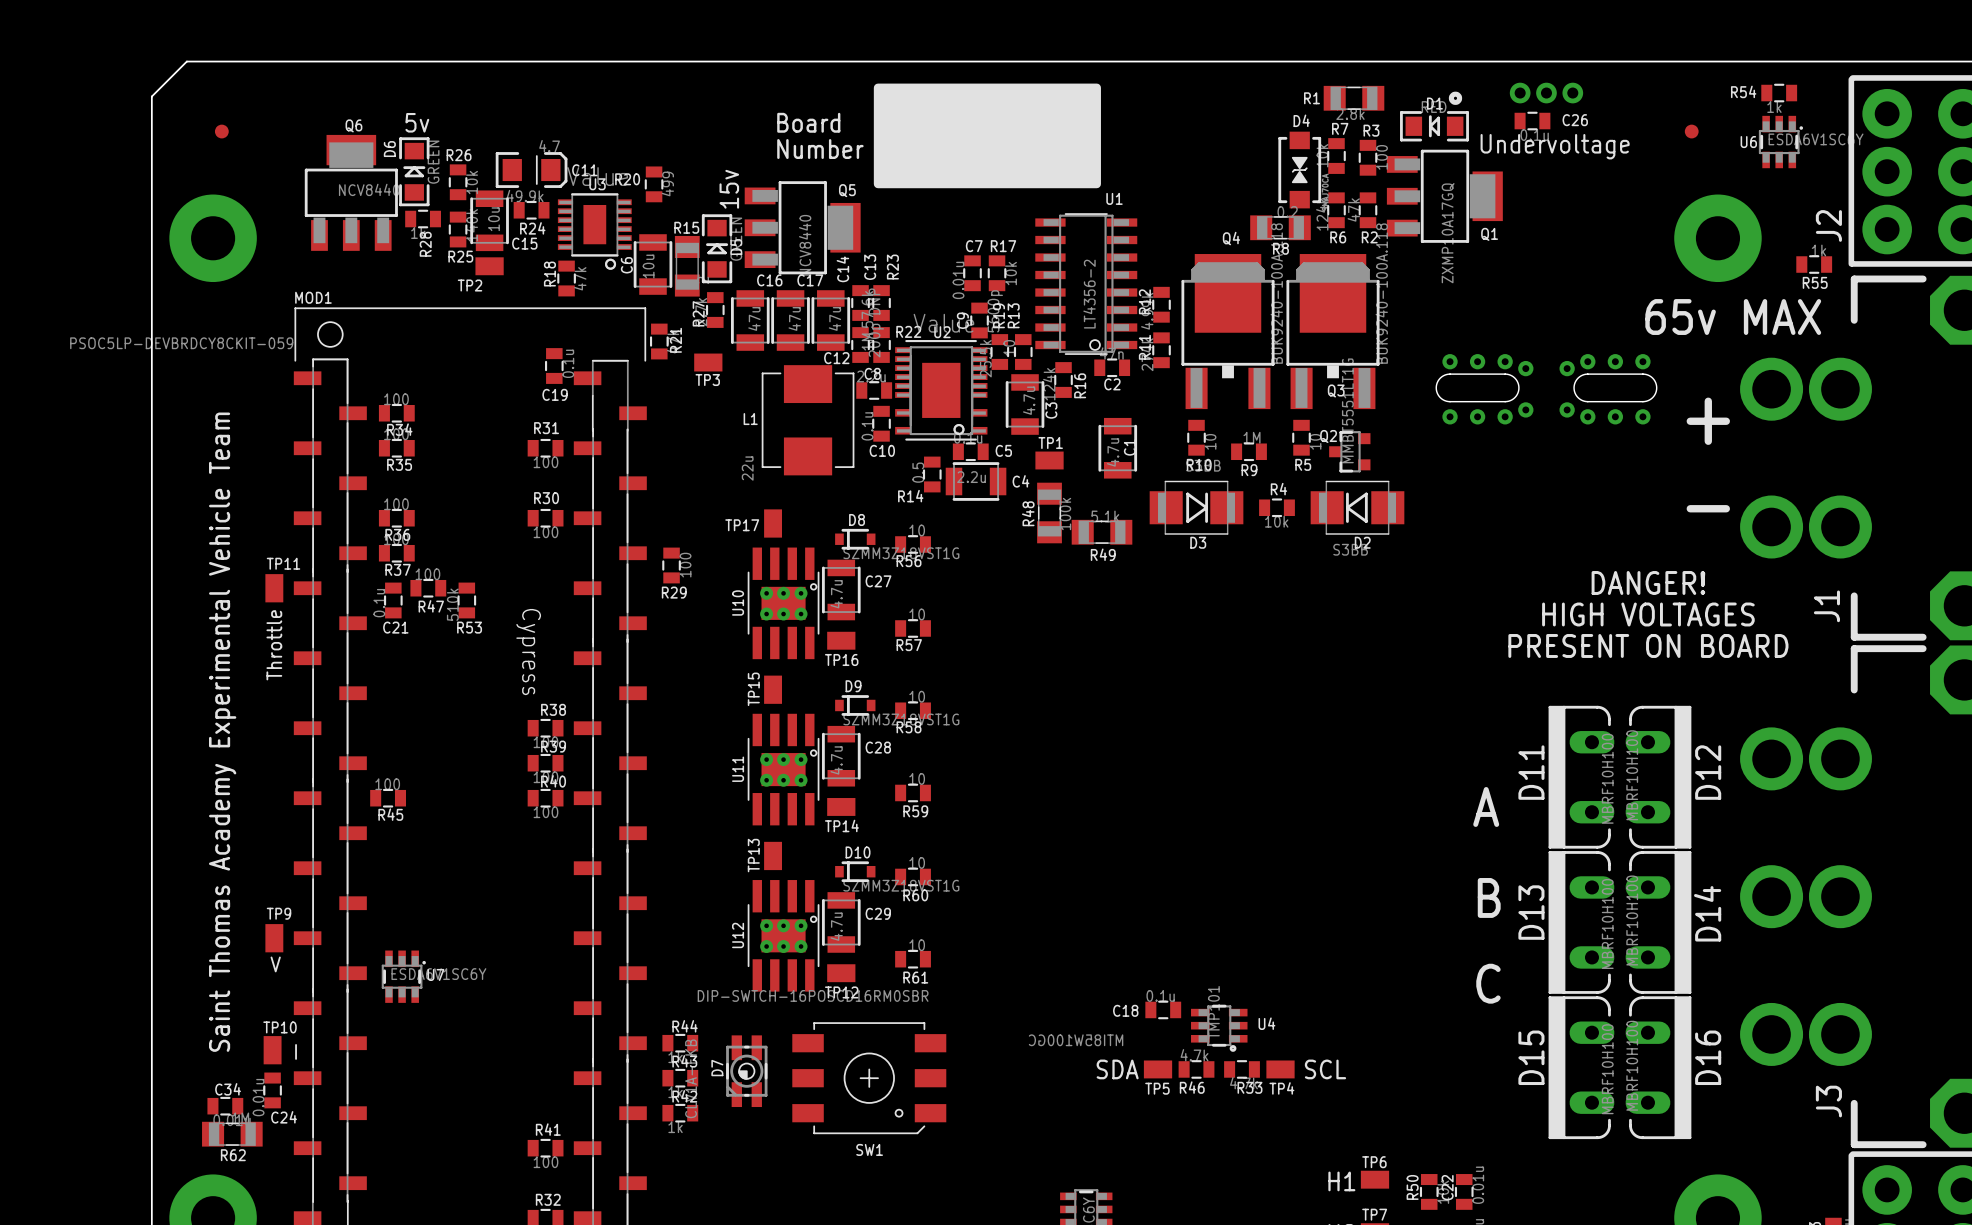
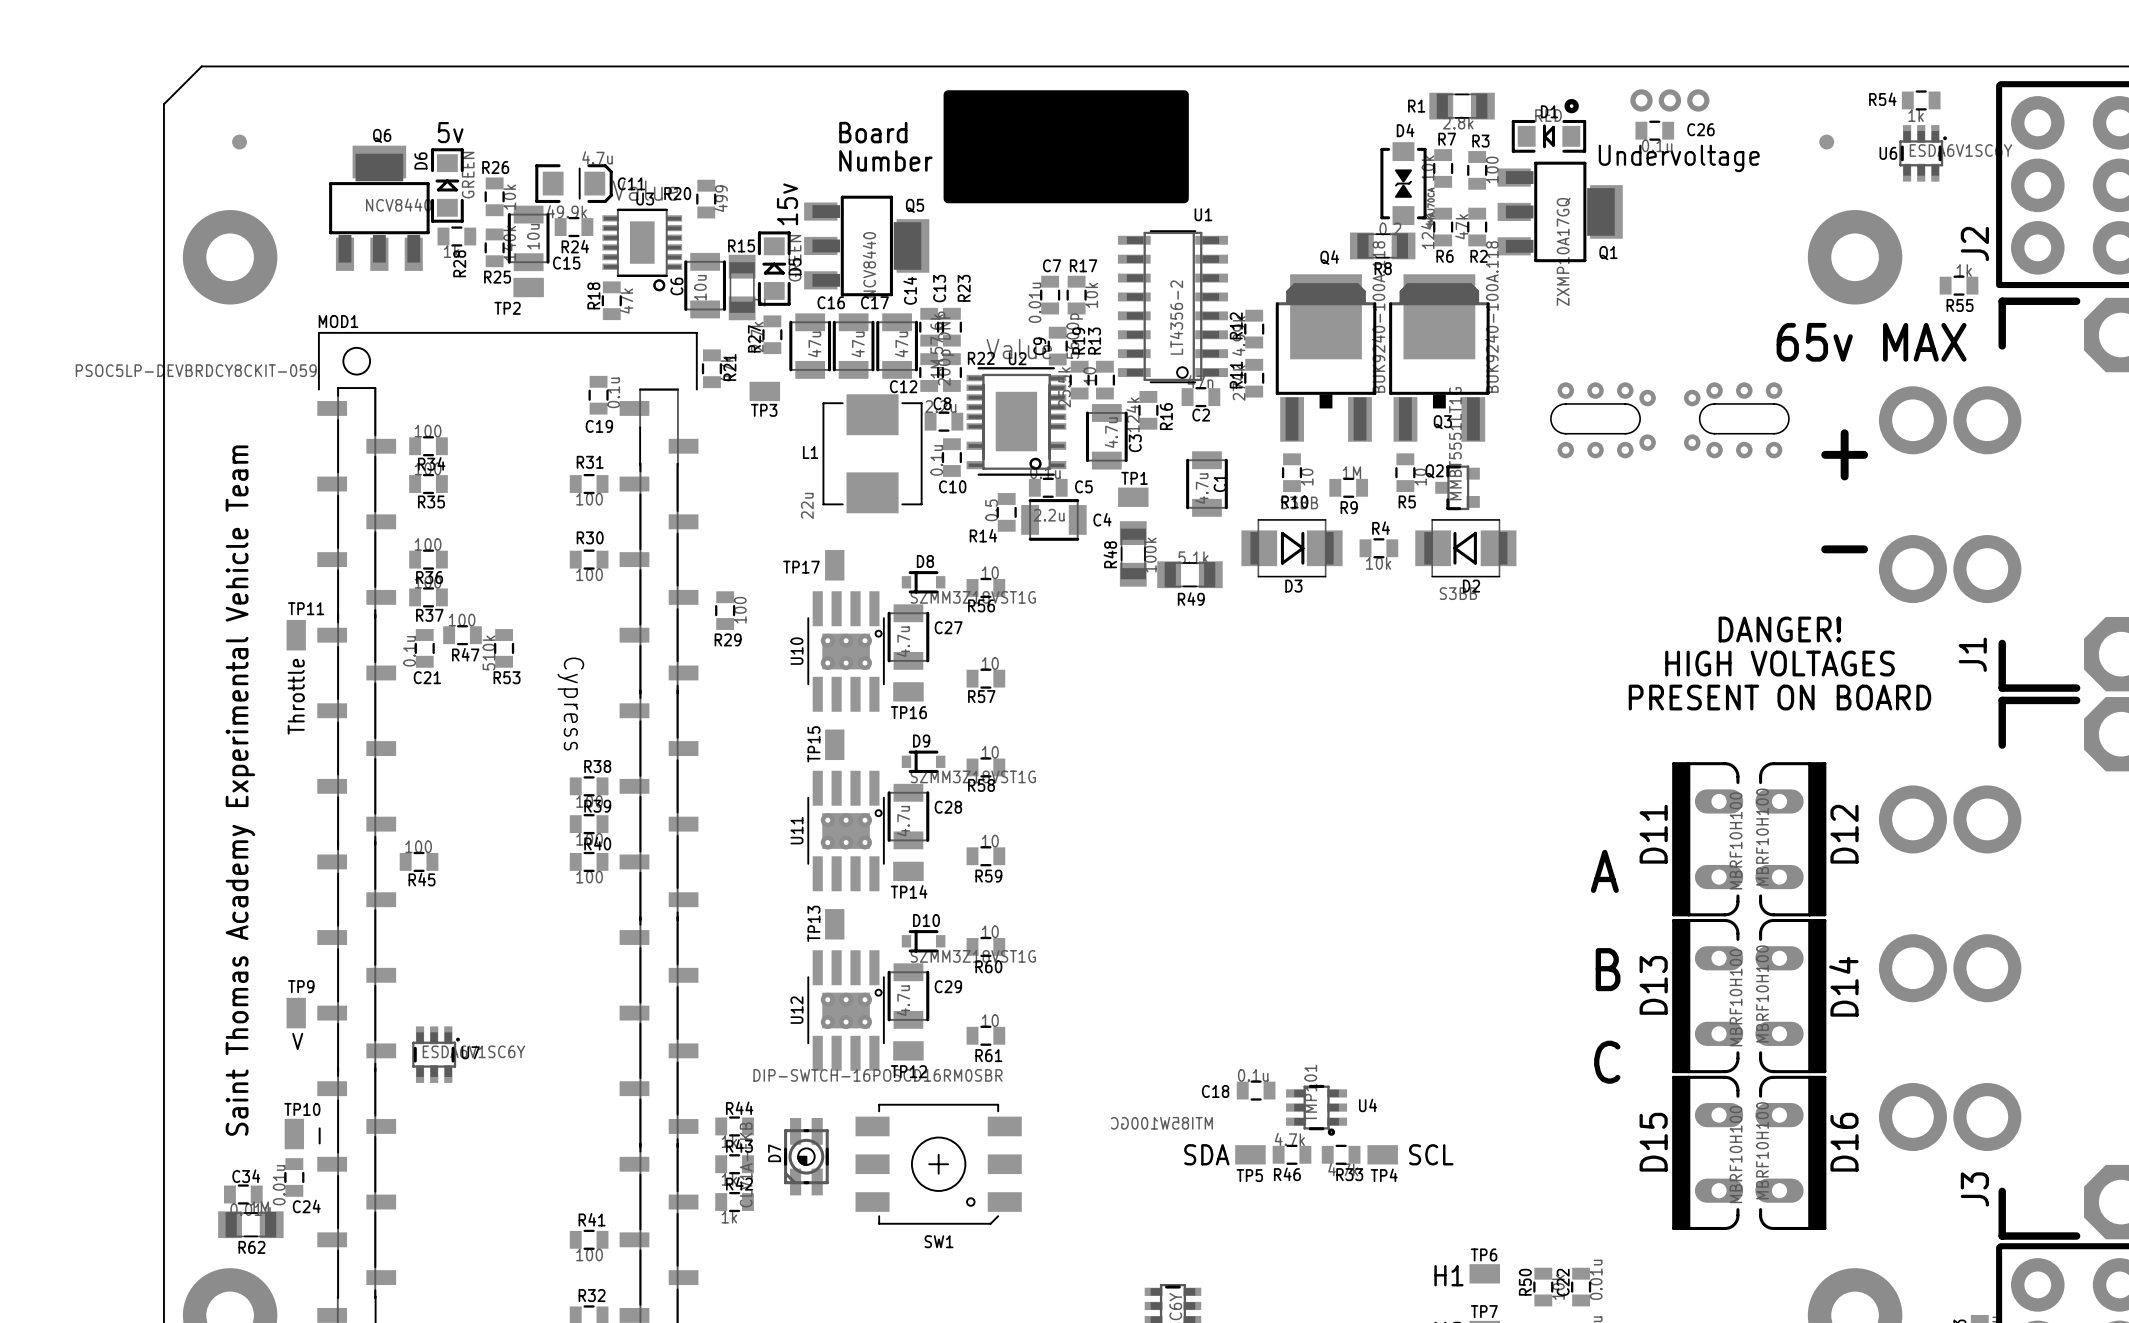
C11 value: 4.7 (549, 146) -> 4.7u (597, 157)

